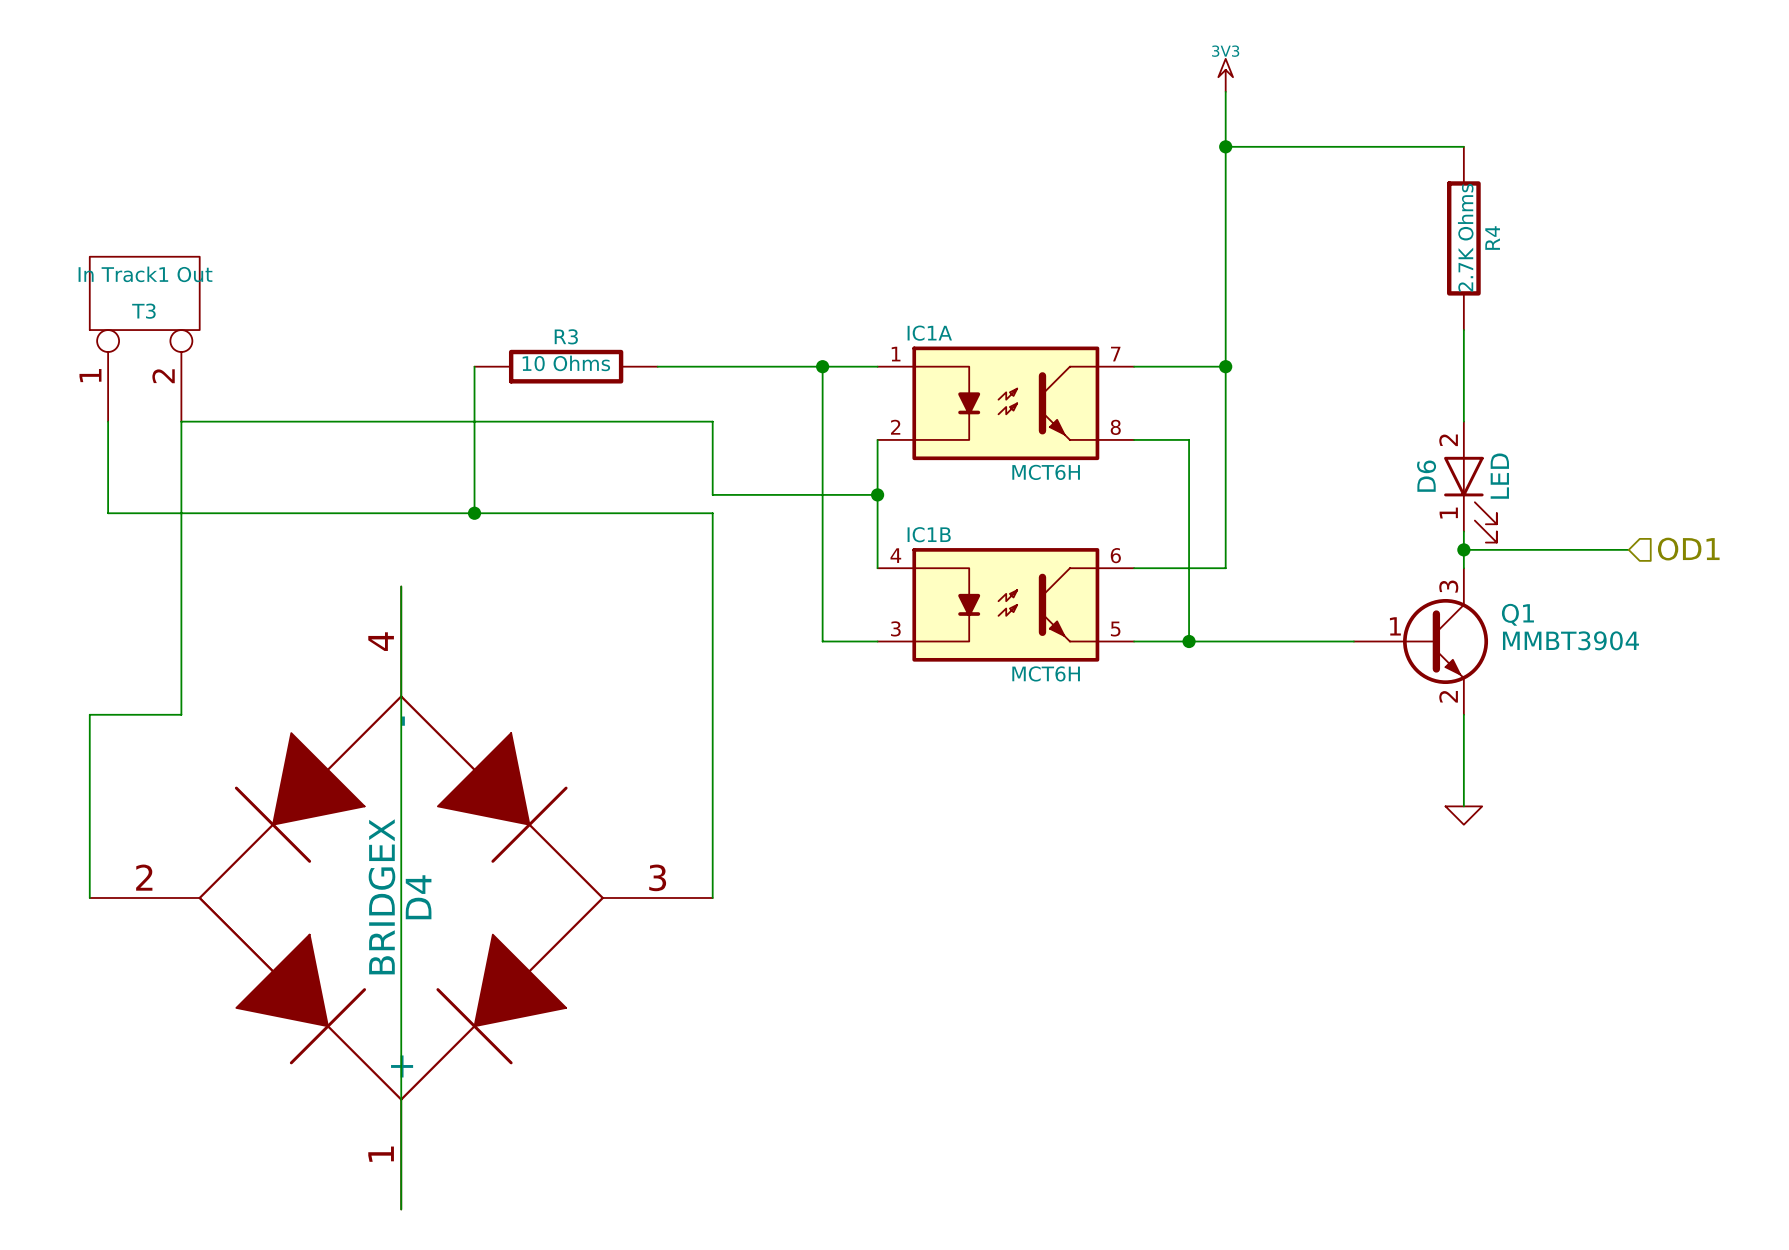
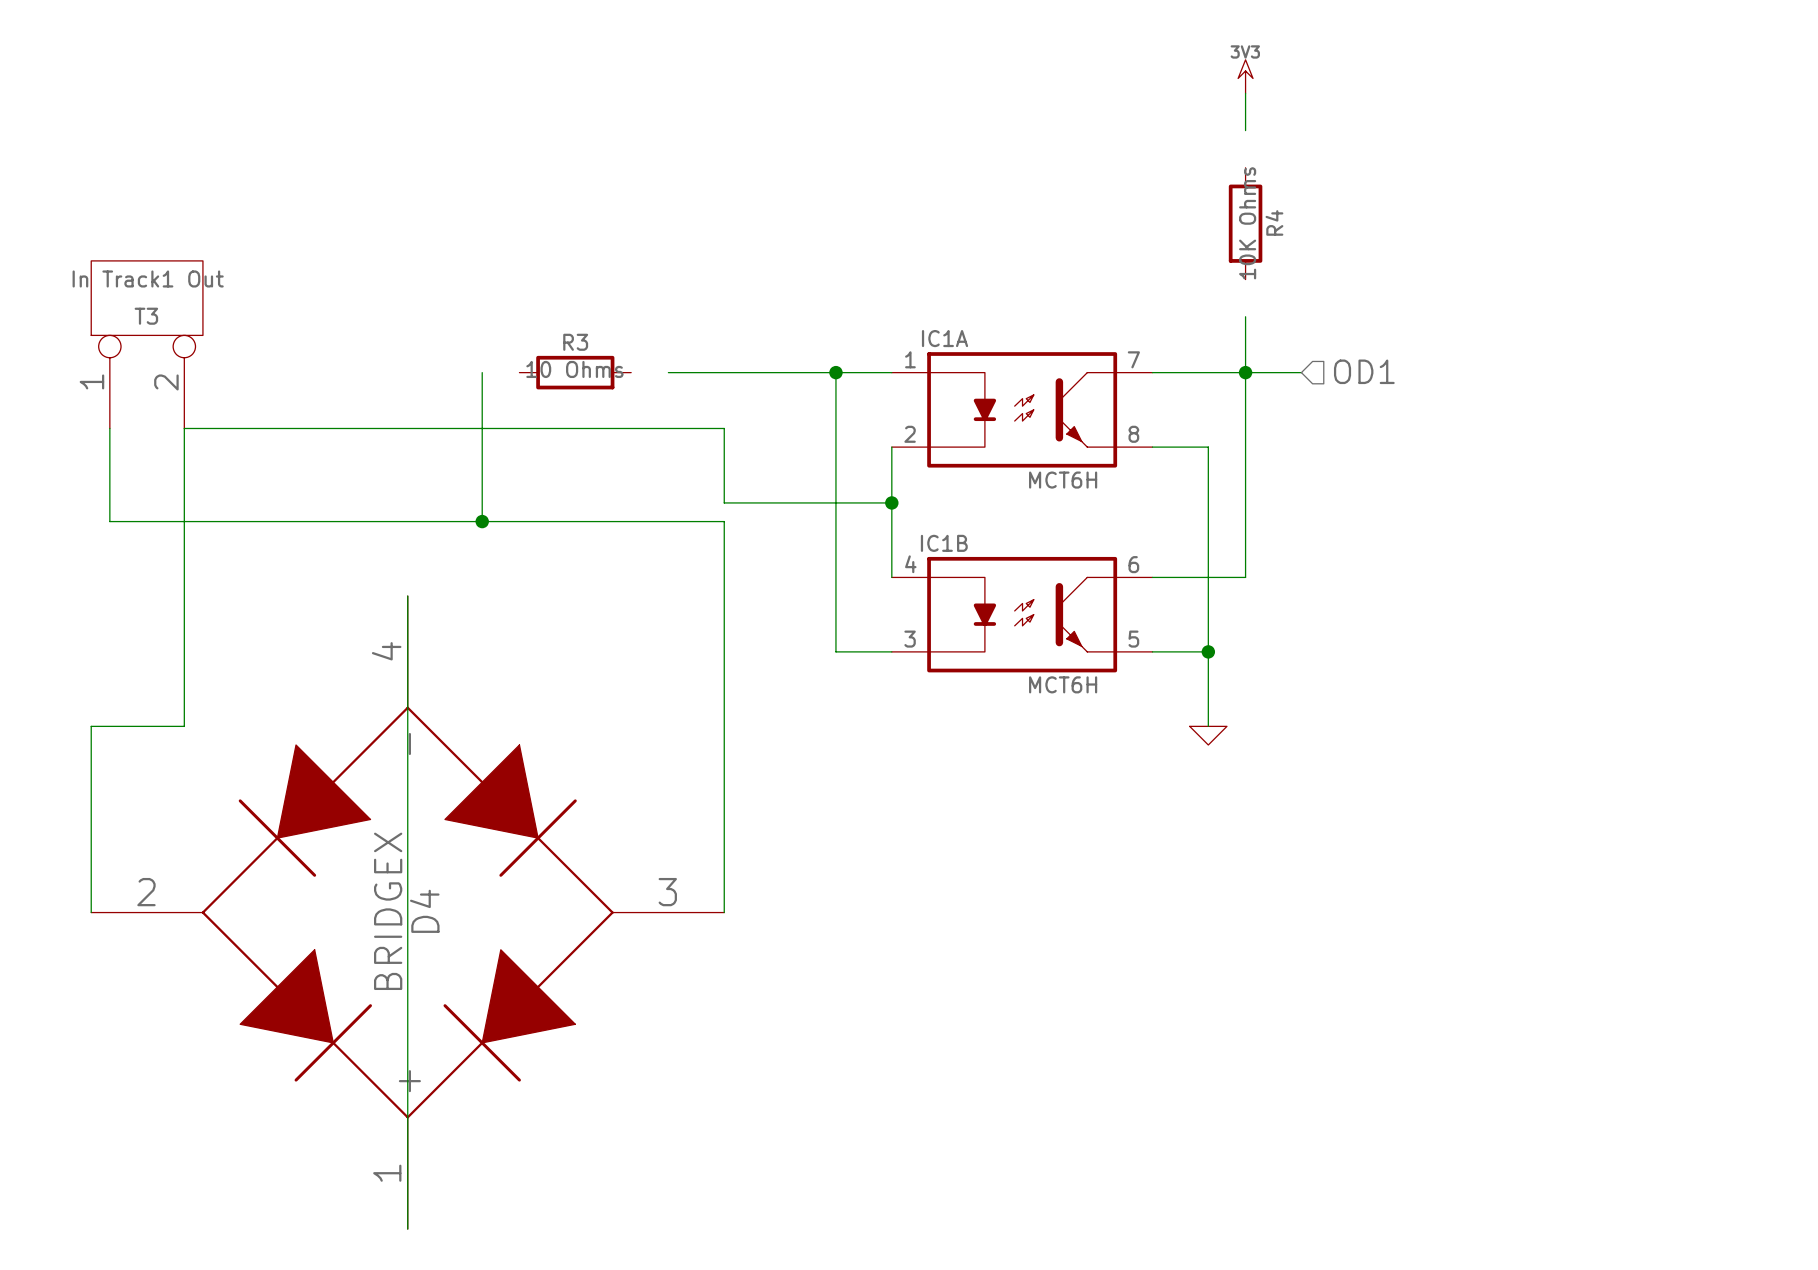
wire: (1225, 128) (1225, 311) -> none
wire: (1225, 146) (1463, 146) -> none
junction: (1225, 146) -> none
R4 symbol: [1447, 146, 1481, 331] -> [1228, 167, 1263, 280]
R4 value: 2.7K Ohms (1465, 237) -> 10K Ohms (1247, 223)
wire: (1463, 330) (1463, 421) -> none
R3 symbol: [474, 349, 658, 384] -> [519, 355, 632, 390]
hierarchical label: none -> OD1 (1364, 371)
wire: none -> (1245, 372) (1301, 372)
D6: LED (1470, 482) -> none
wire: (1463, 531) (1463, 568) -> none
wire: (1463, 549) (1628, 549) -> none
junction: (1463, 549) -> none
hierarchical label: OD1 (1688, 549) -> none
wire: (1189, 641) (1353, 641) -> (1208, 651) (1208, 726)
Q1: MMBT3904 (1420, 641) -> none
wire: (1463, 714) (1463, 806) -> none
power symbol position: (1463, 815) -> (1208, 735)

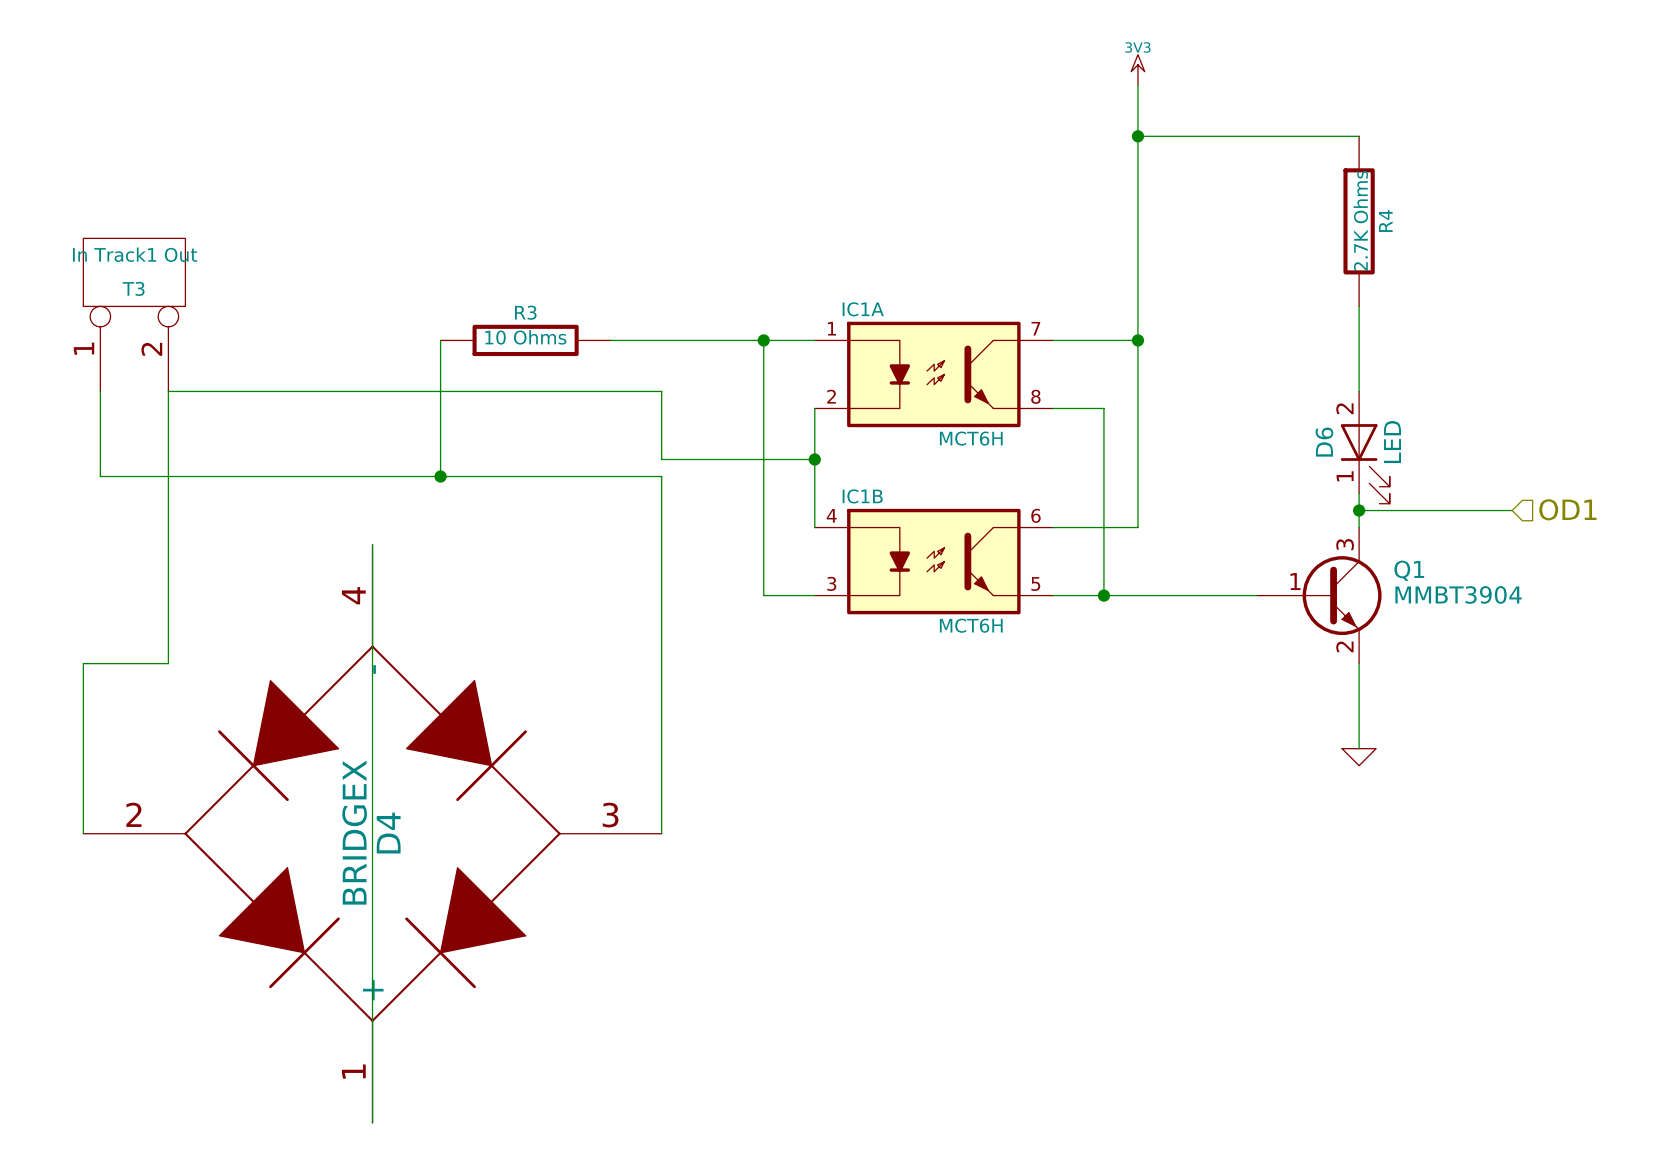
wire: none -> (1137, 119) (1137, 289)
wire: none -> (1137, 136) (1359, 136)
junction: none -> (1137, 136)
R4 symbol: [1228, 167, 1263, 280] -> [1343, 136, 1375, 307]
R4 value: 10K Ohms (1247, 223) -> 2.7K Ohms (1360, 220)
wire: none -> (1359, 306) (1359, 391)
R3 symbol: [519, 355, 632, 390] -> [440, 324, 611, 357]
hierarchical label: OD1 (1364, 371) -> none
wire: (1245, 372) (1301, 372) -> none
D6: none -> LED (1365, 447)
wire: none -> (1359, 493) (1359, 527)
hierarchical label: none -> OD1 (1567, 509)
wire: none -> (1359, 510) (1512, 510)
junction: none -> (1359, 510)
wire: (1208, 651) (1208, 726) -> (1103, 595) (1257, 595)
Q1: none -> MMBT3904 (1319, 595)
wire: none -> (1359, 663) (1359, 748)
power symbol position: (1208, 735) -> (1359, 757)

